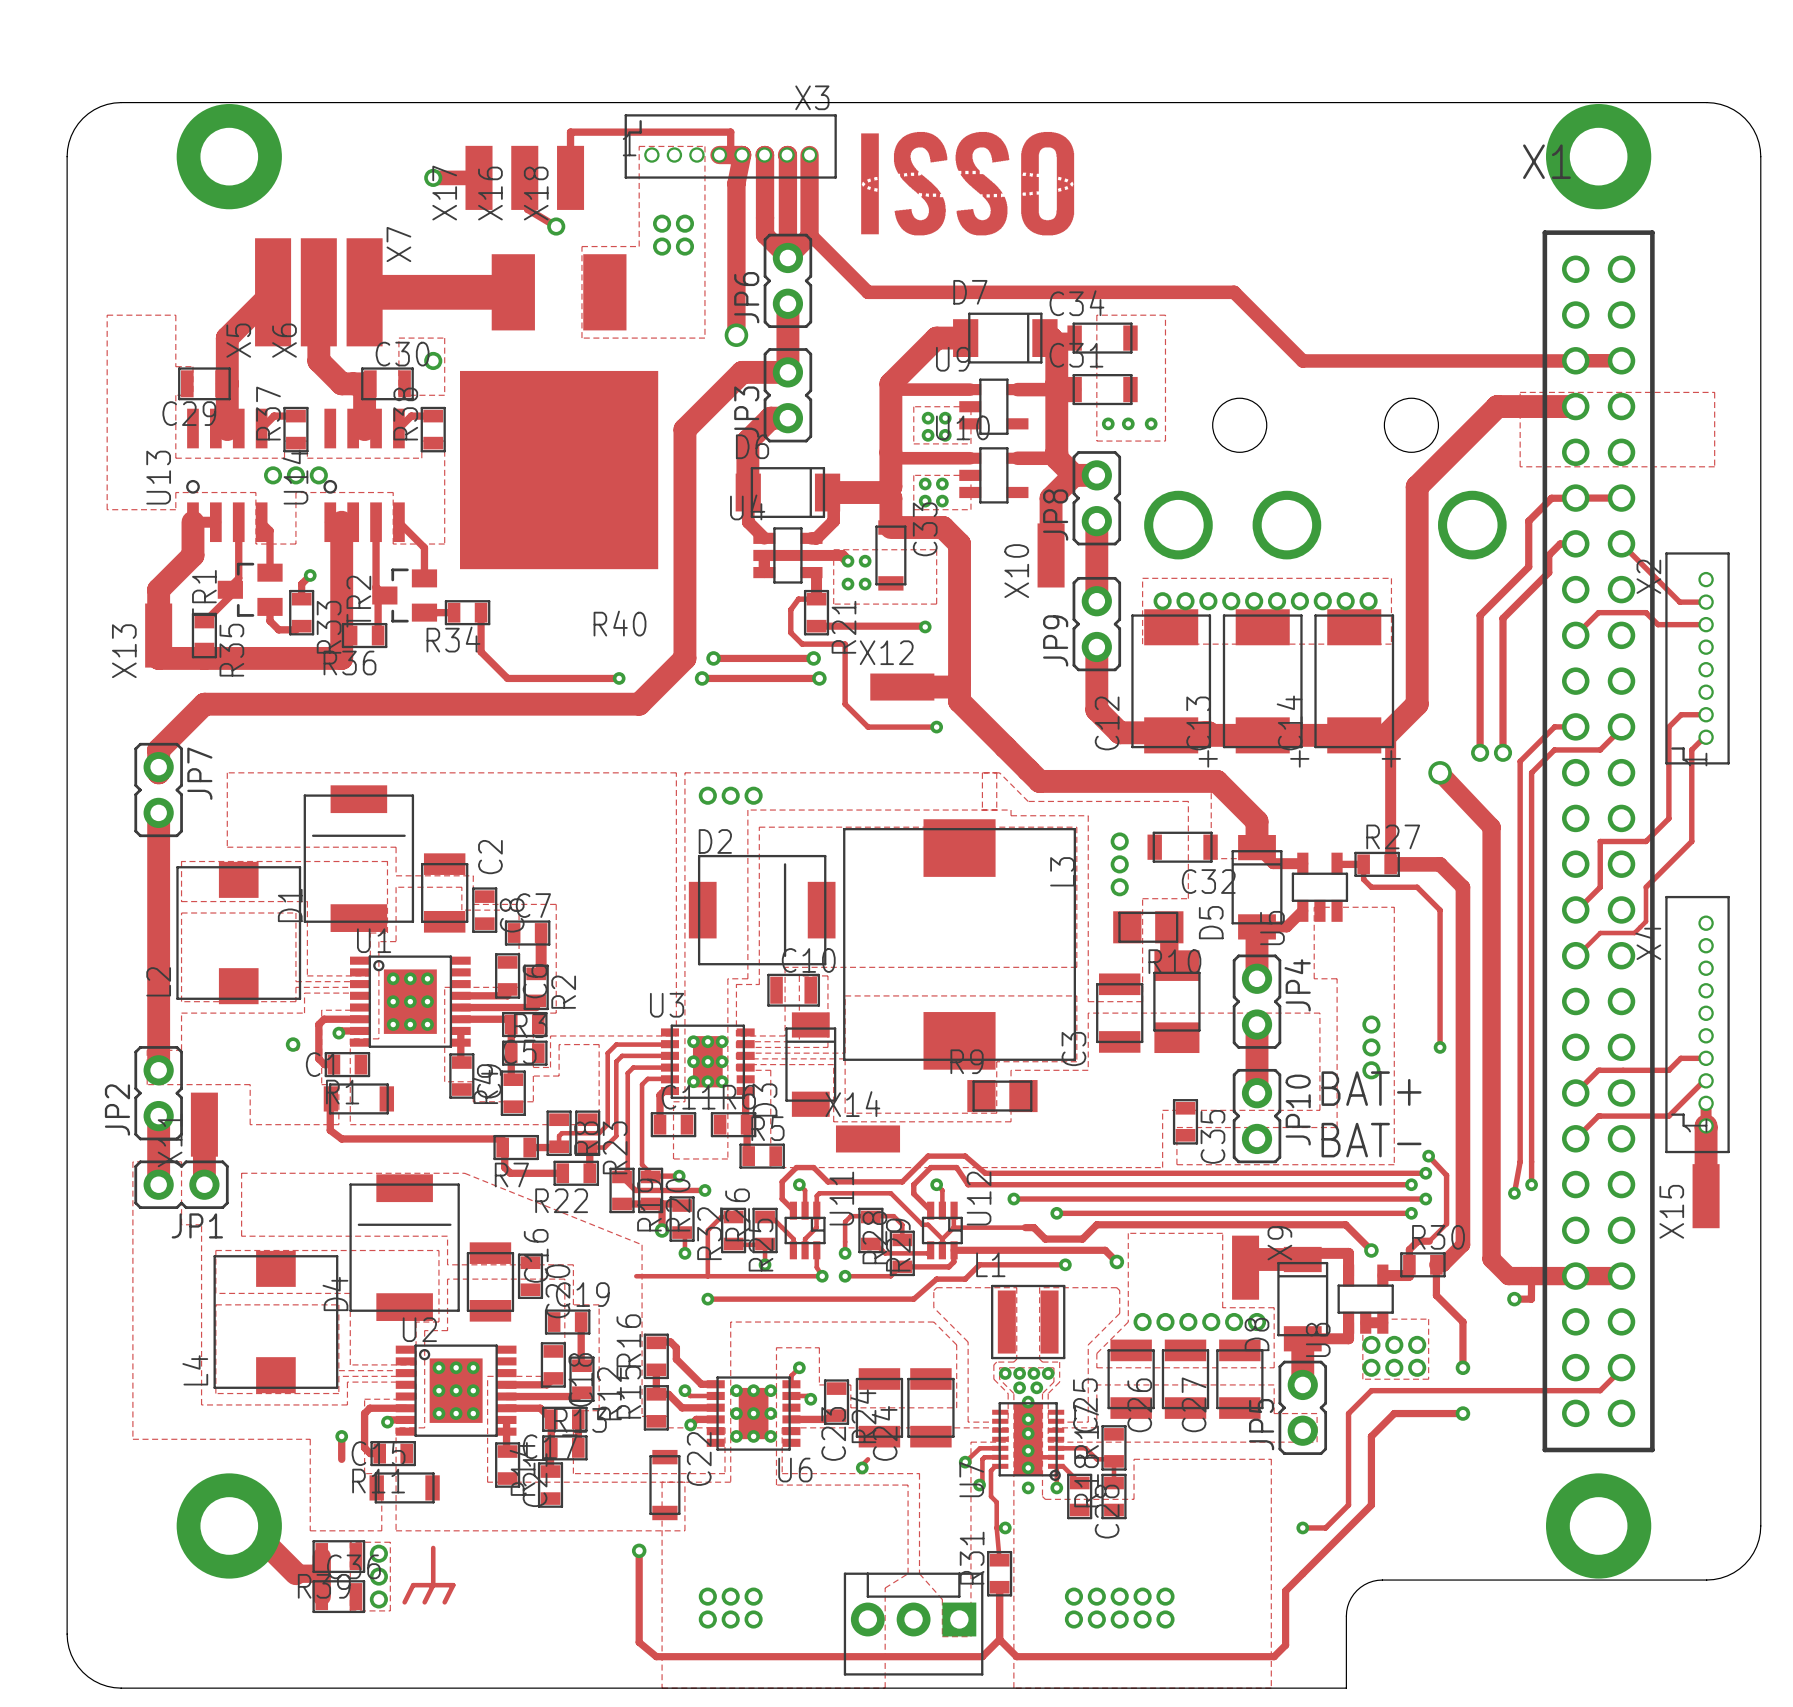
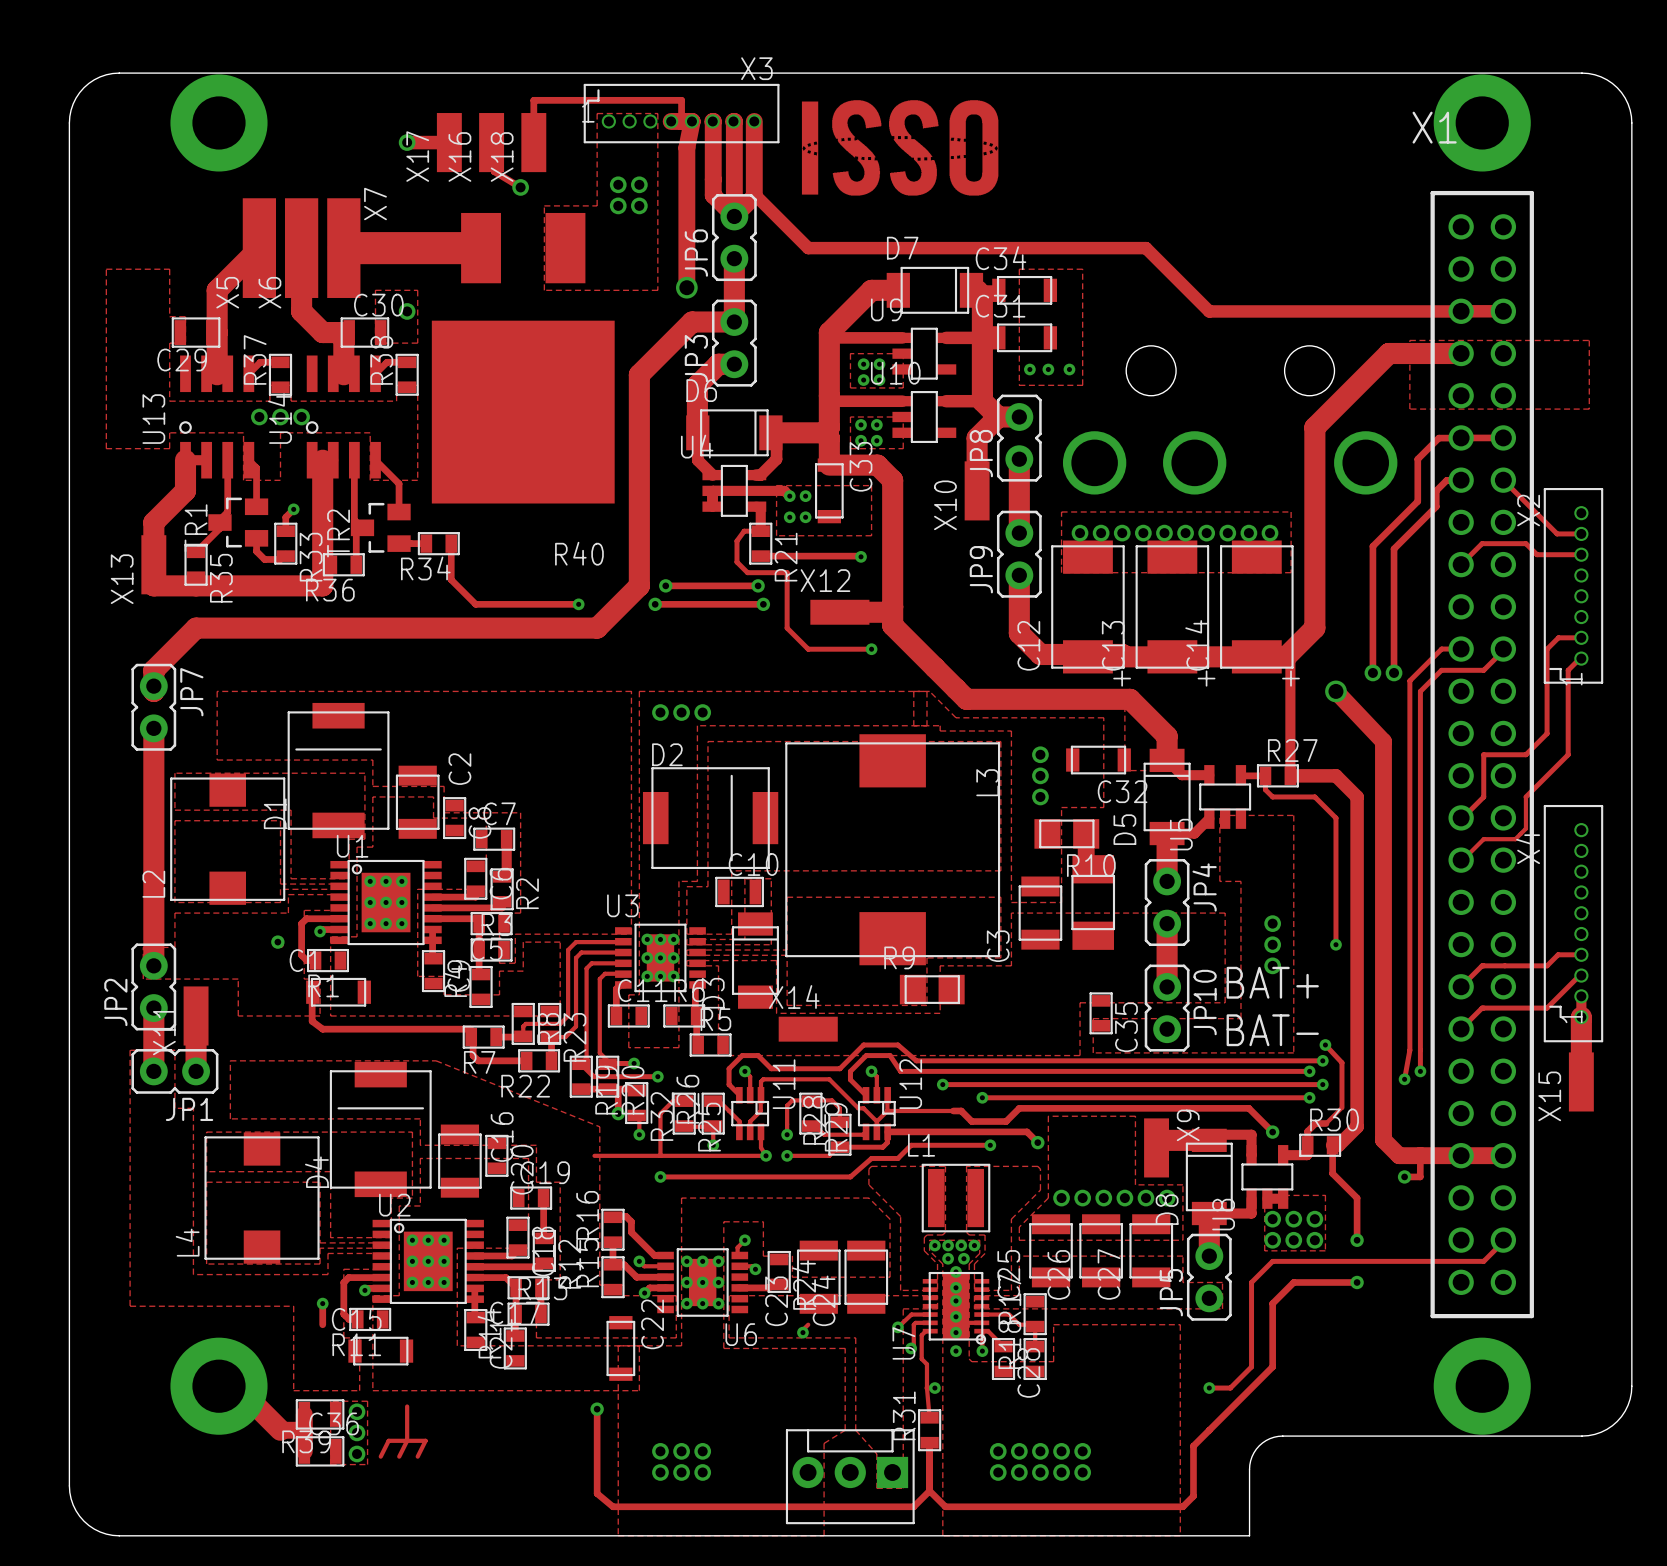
U3 footprint: [660, 1024, 755, 1099] -> [615, 923, 706, 993]
U6 footprint: [706, 1376, 801, 1451] -> [657, 1248, 749, 1317]

